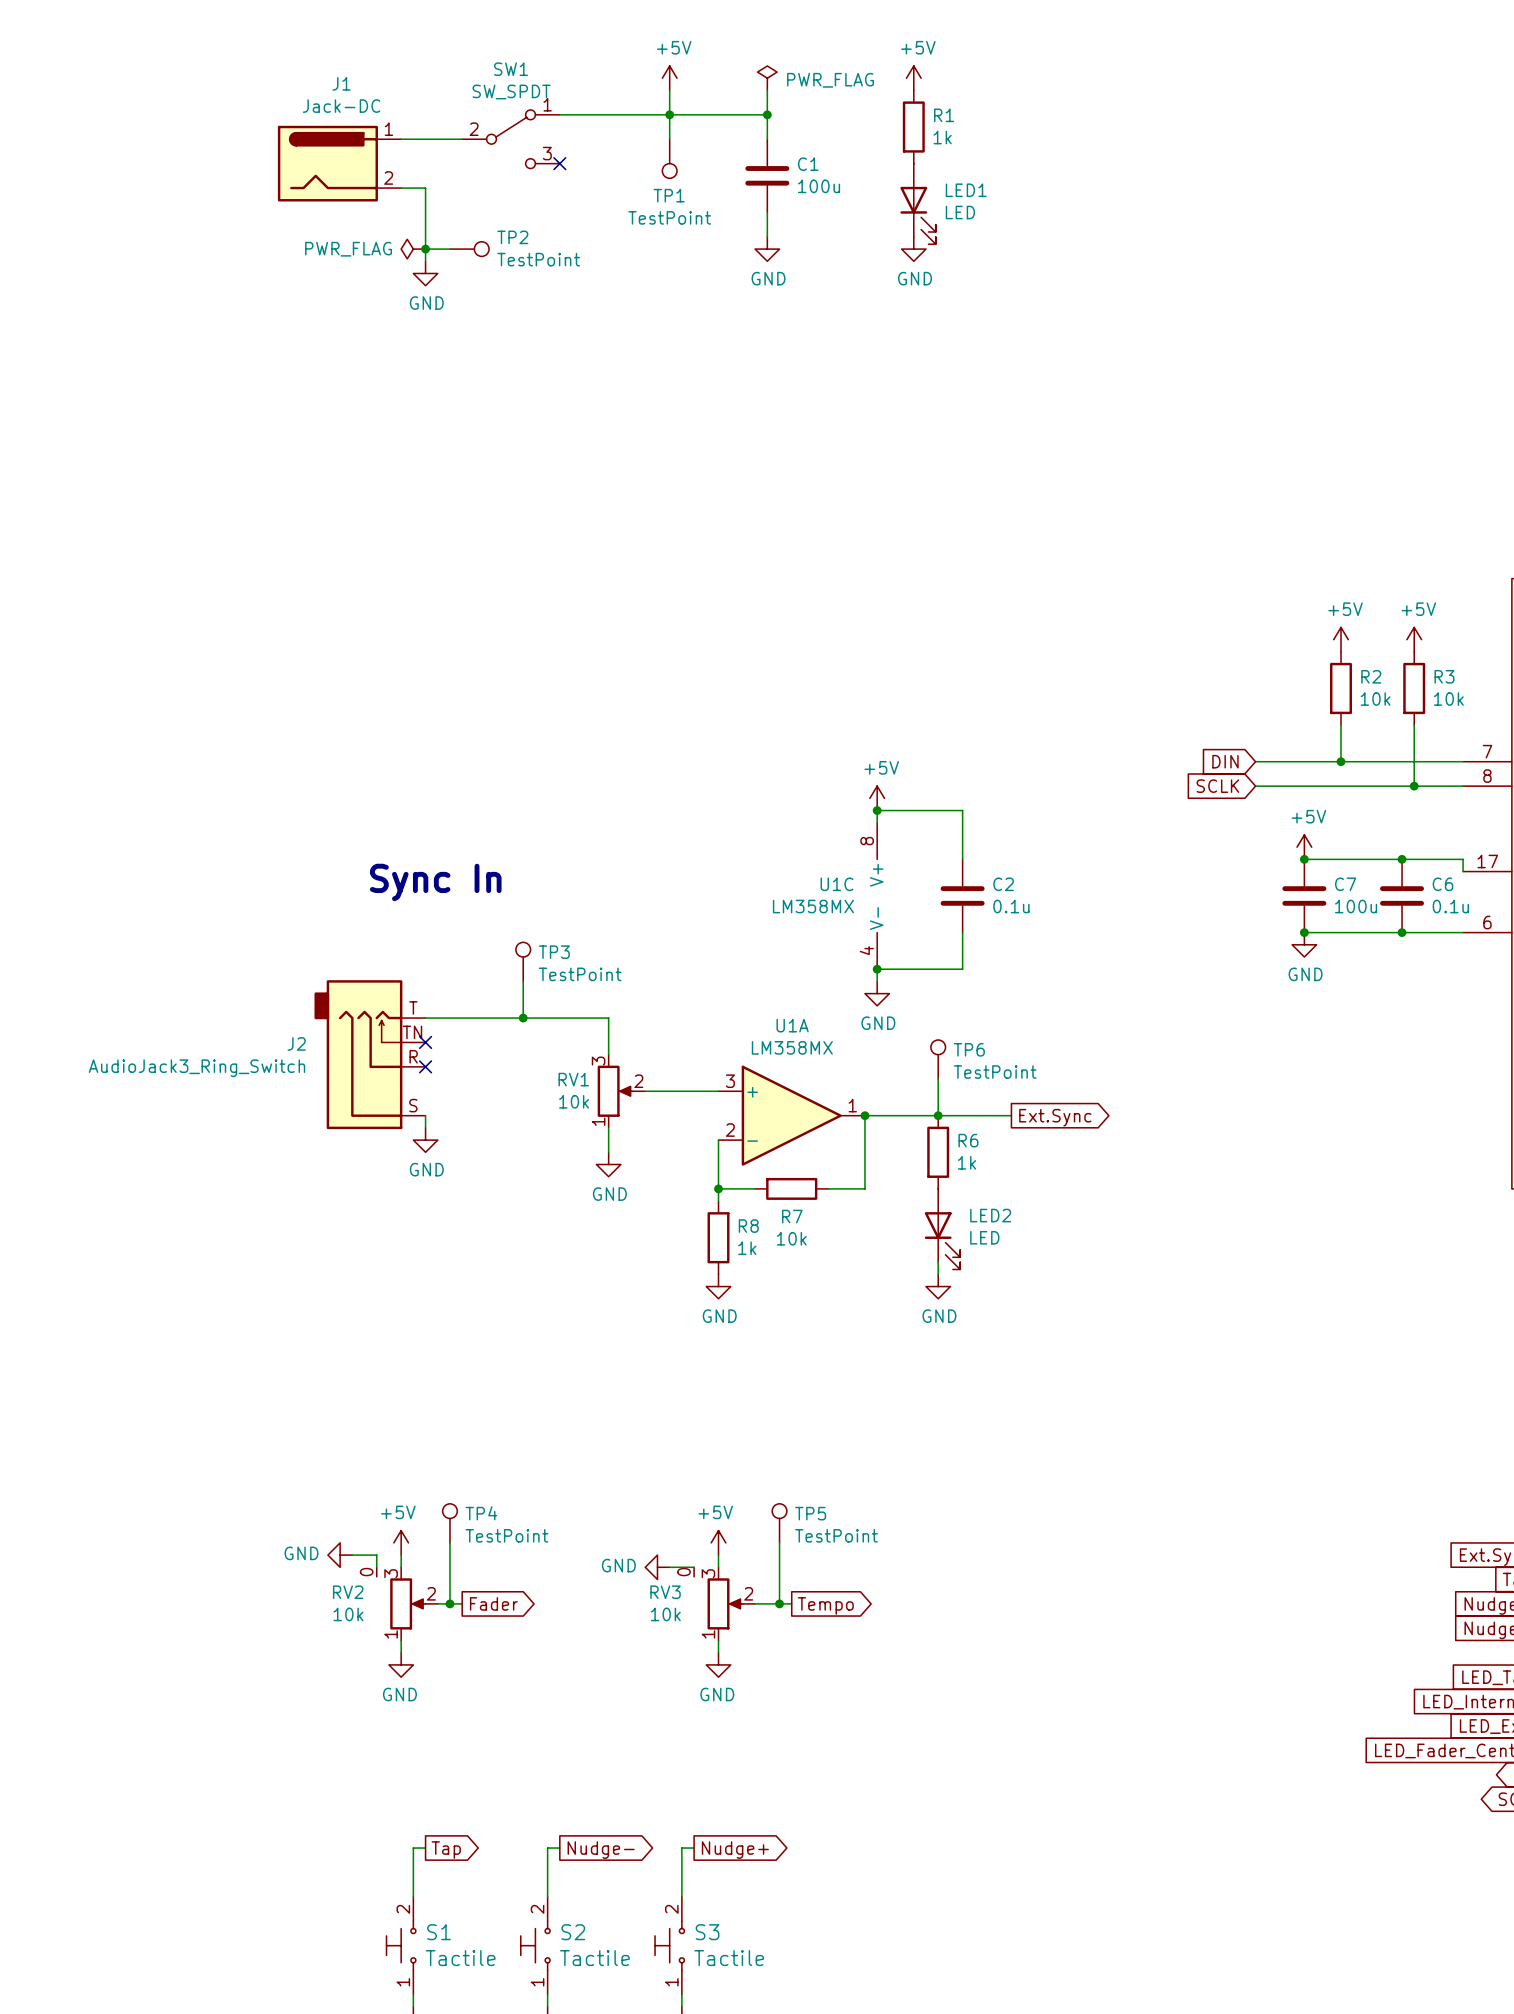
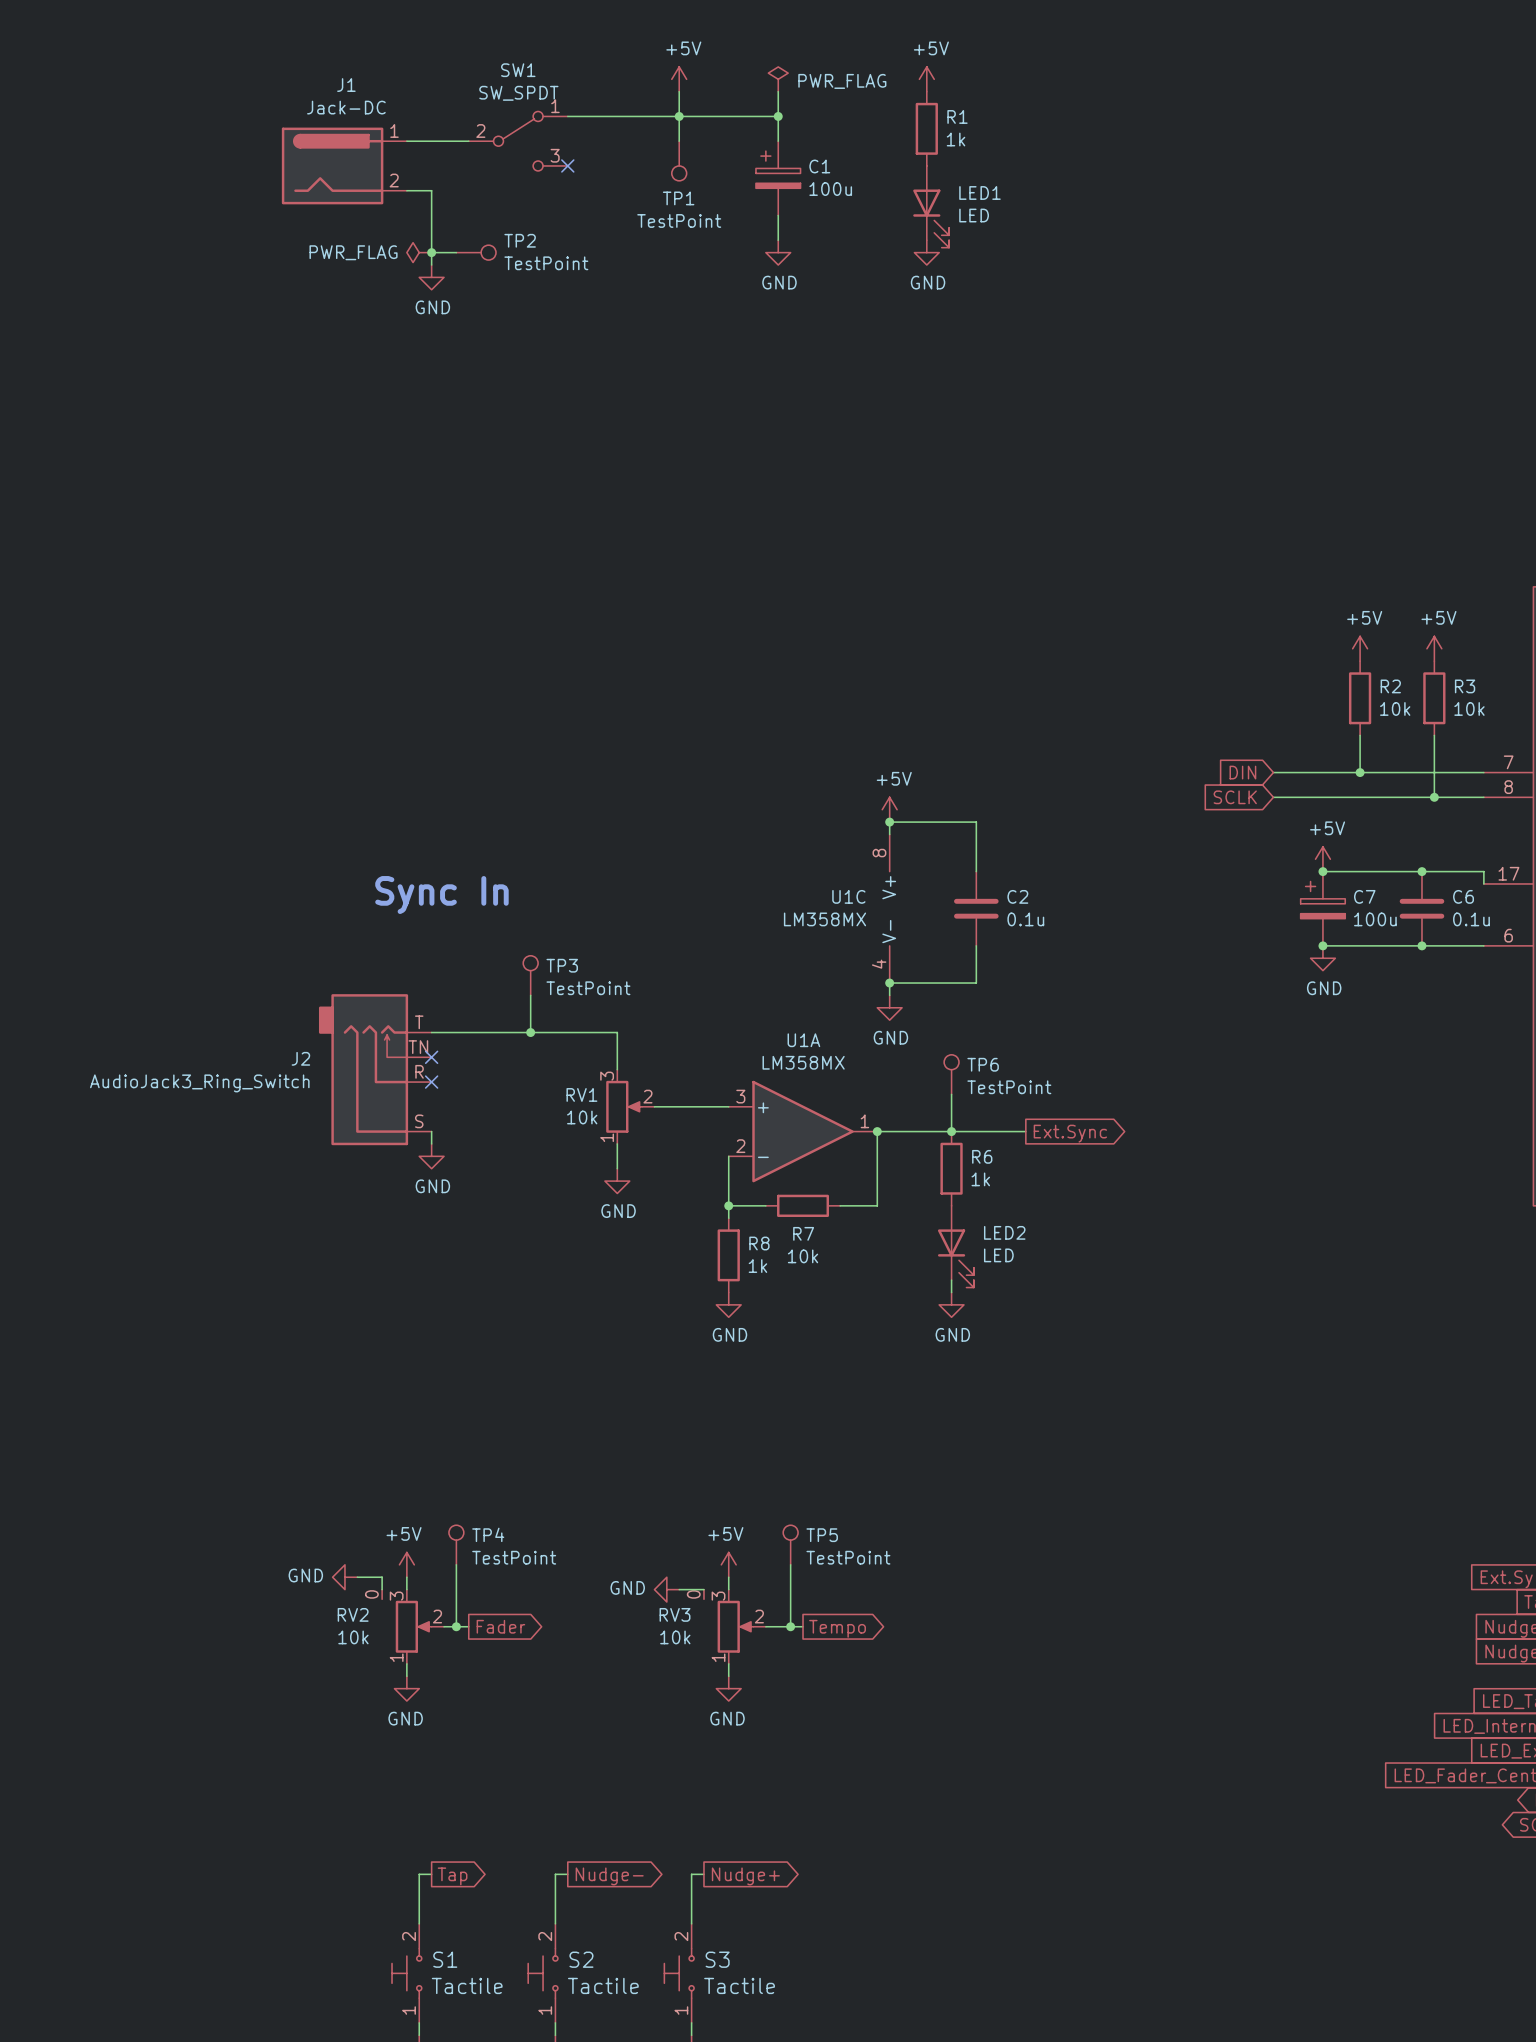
C1 symbol: [745, 139, 790, 213] -> [755, 141, 801, 216]
C7 symbol: [1282, 859, 1327, 933] -> [1300, 871, 1346, 946]

